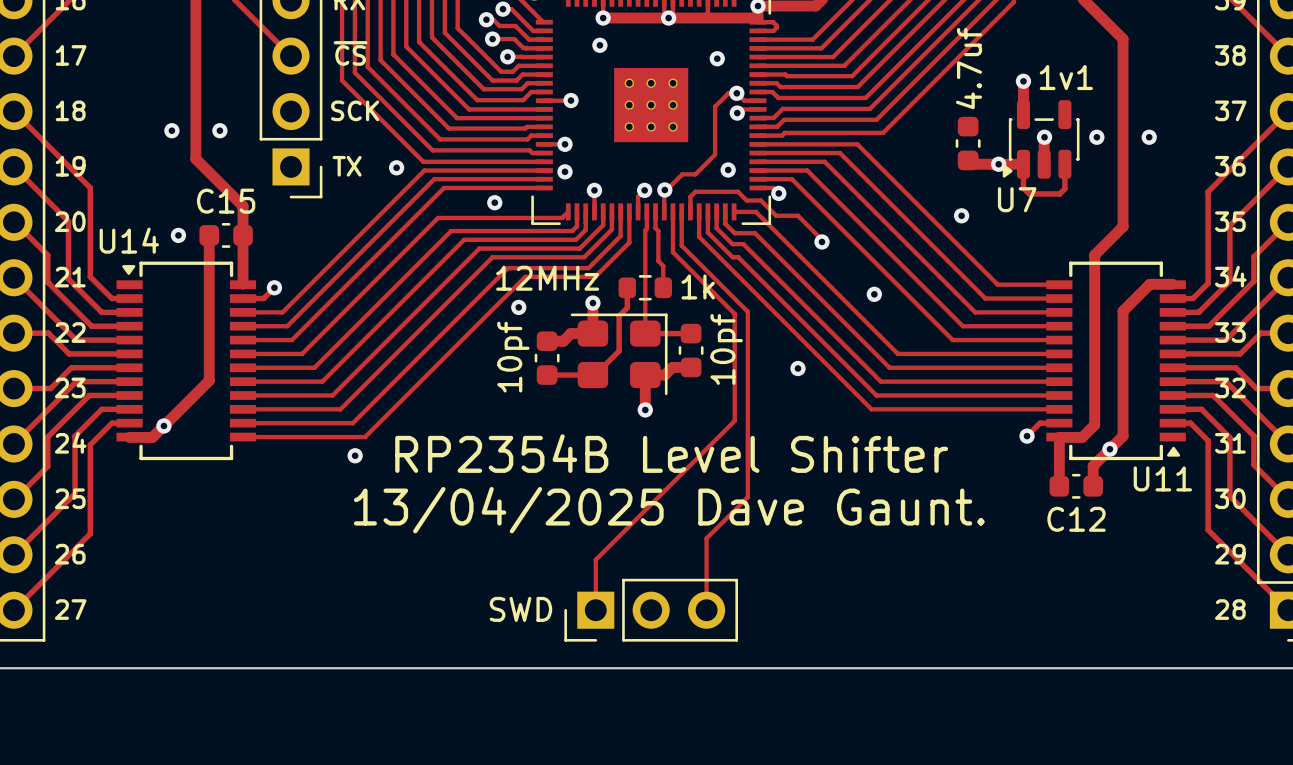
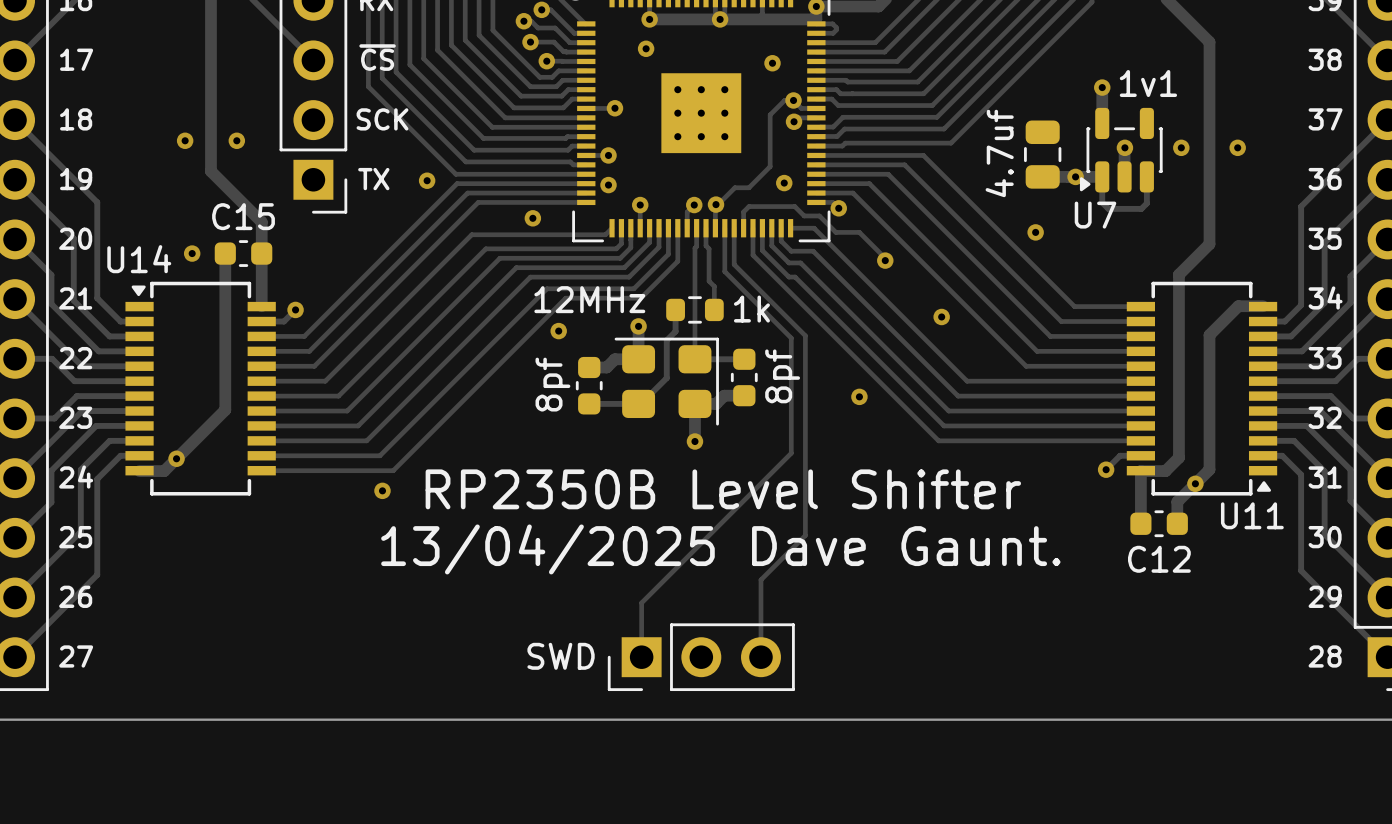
part value position: 4.7uf (969, 68) -> 4.7uf (999, 153)
part footprint: [955, 116, 981, 171] -> [1024, 120, 1062, 189]
part value: 10pf (726, 349) -> 8pf (782, 376)
part value: 10pf (513, 357) -> 8pf (552, 384)
text: RP2354B Level Shifter (671, 453) -> RP2350B Level Shifter (723, 489)

